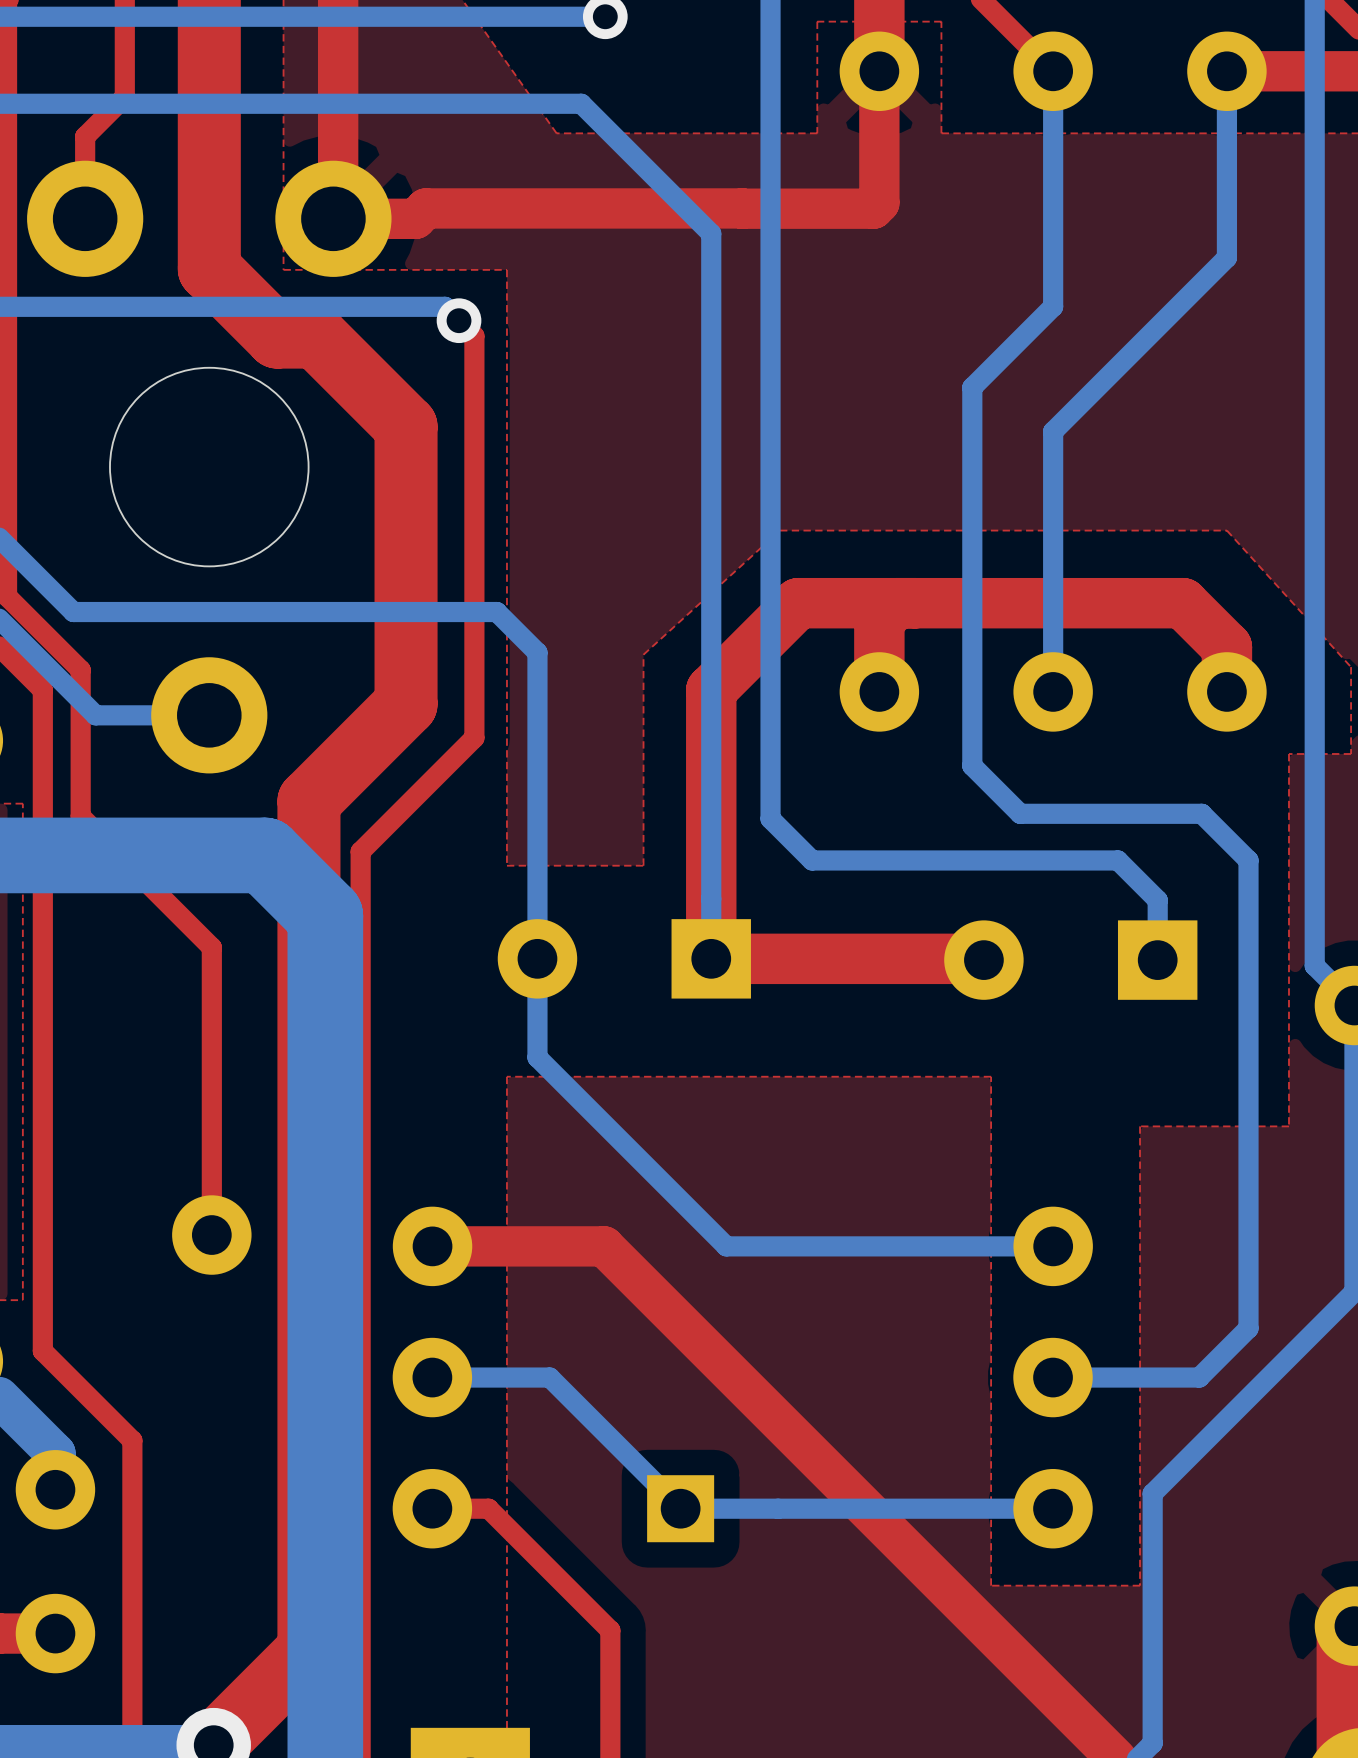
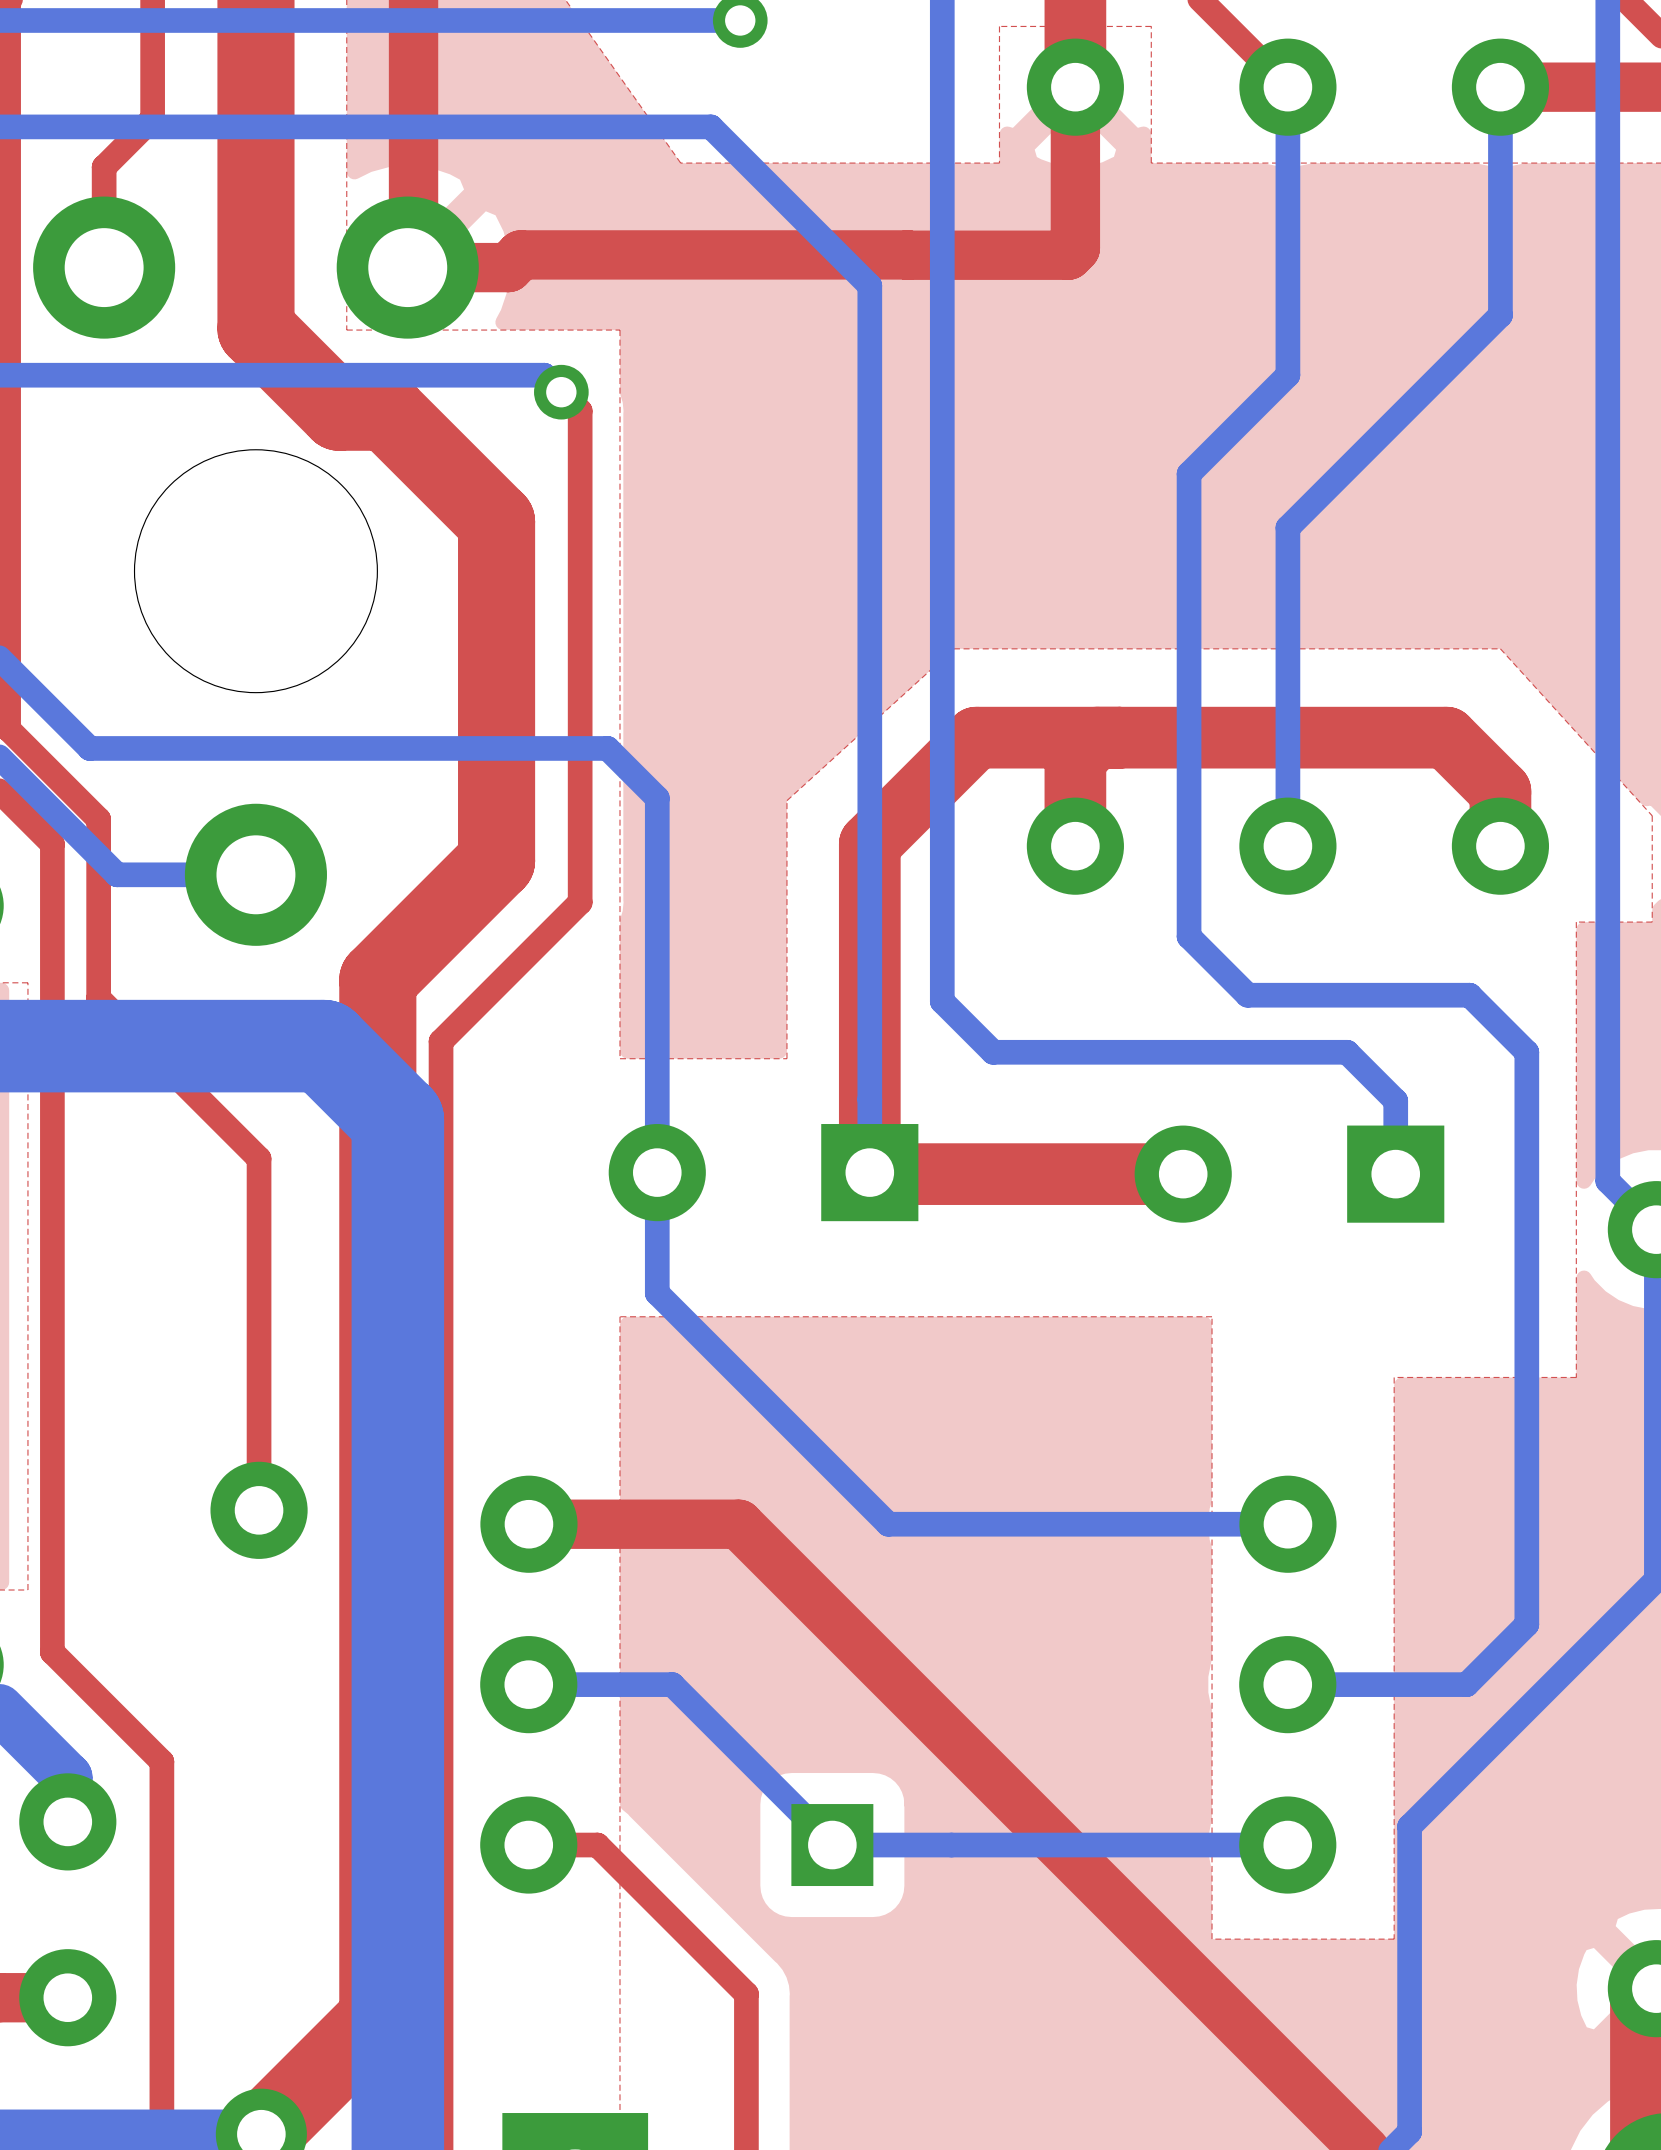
bottom track: (1101, 860) (1117, 860) (1157, 900) (1157, 960) -> (1347, 1052) (1395, 1100) (1395, 1174)
top track: (711, 958) (983, 960) -> (871, 1174) (1183, 1174)
part position: (1070, 960) -> (1289, 1174)

